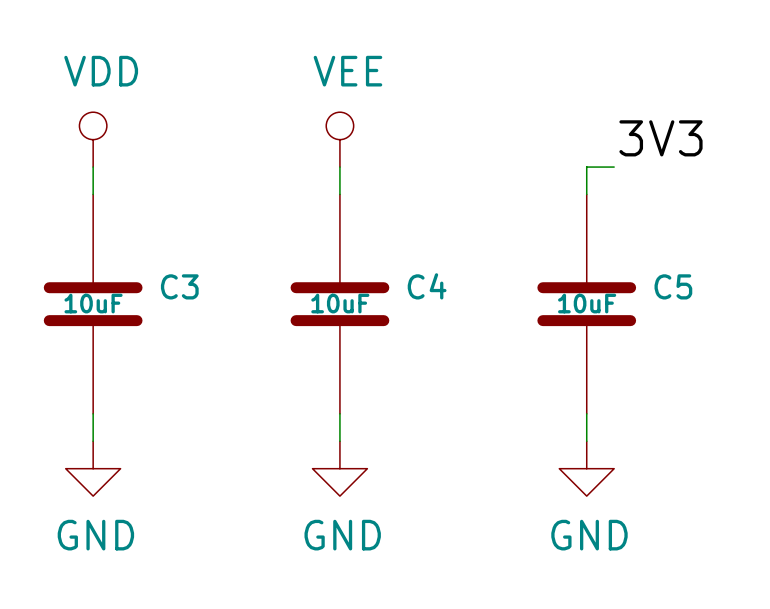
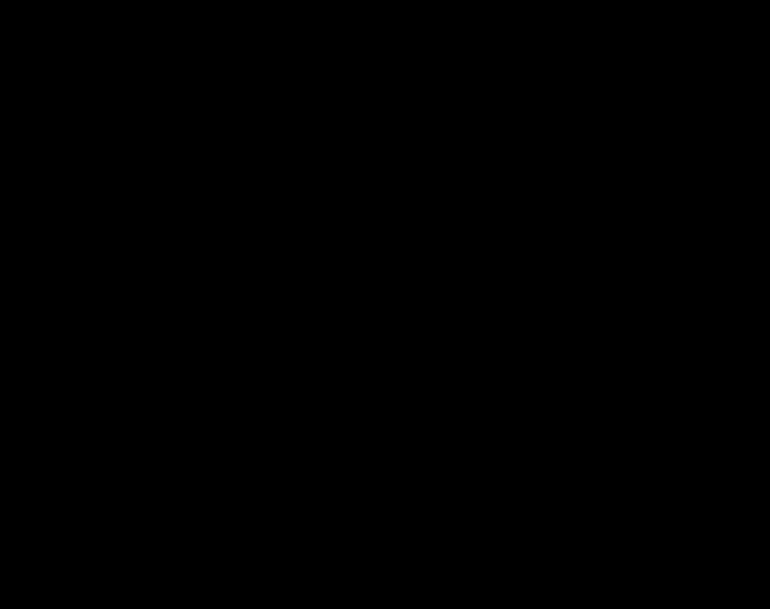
label: 3V3 (660, 138) -> none
power symbol: VDD (93, 139) -> none
power symbol: VEE (339, 139) -> none
wire: (93, 167) (93, 194) -> none
wire: (339, 167) (339, 194) -> none
wire: (614, 167) (586, 167) (586, 194) -> none
C3: 10uF (93, 304) -> none
C4: 10uF (339, 304) -> none
C5: 10uF (586, 304) -> none
wire: (93, 413) (93, 441) -> none
wire: (339, 413) (339, 441) -> none
wire: (586, 413) (586, 441) -> none
power symbol: GND (93, 468) -> none
power symbol: GND (339, 468) -> none
power symbol: GND (586, 468) -> none

